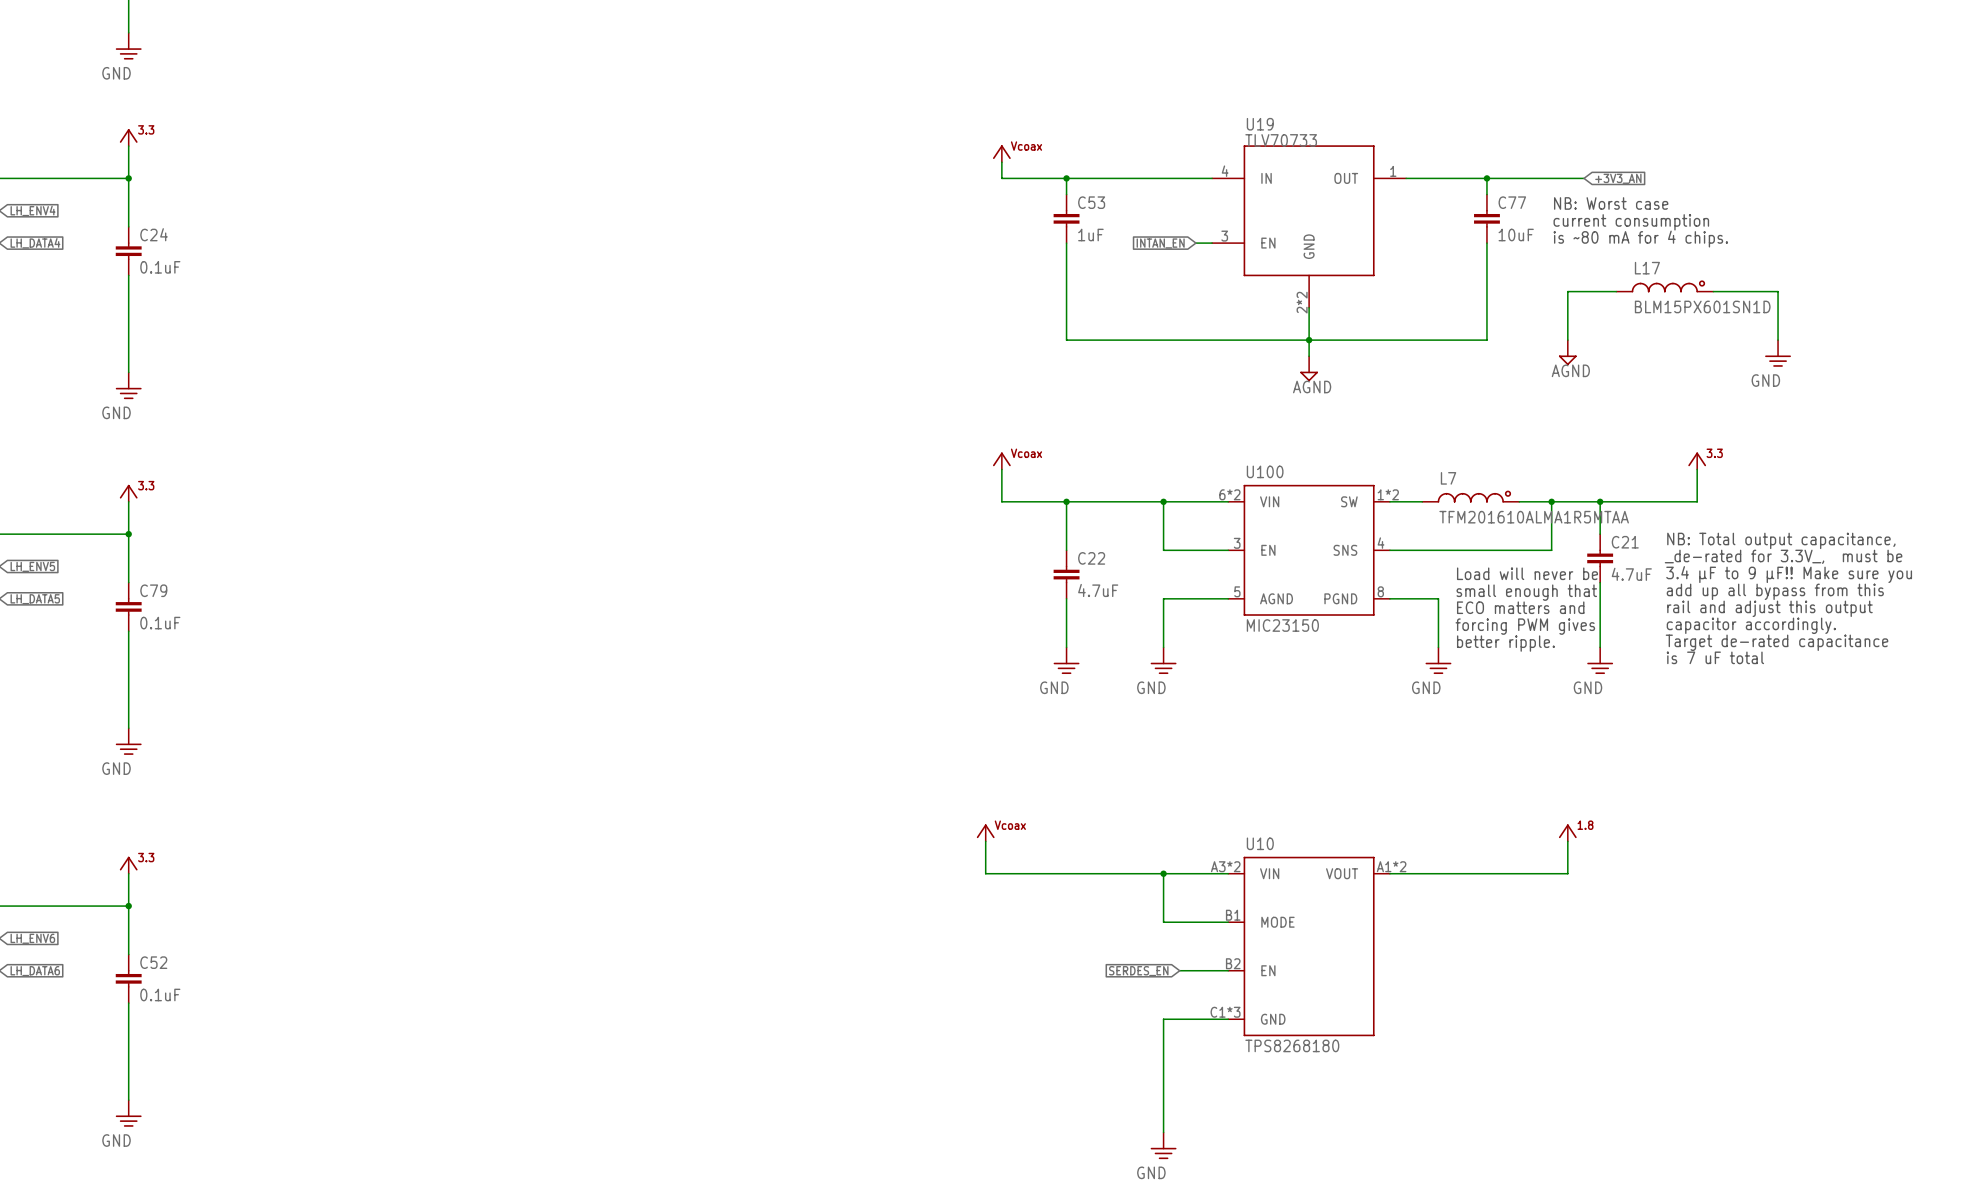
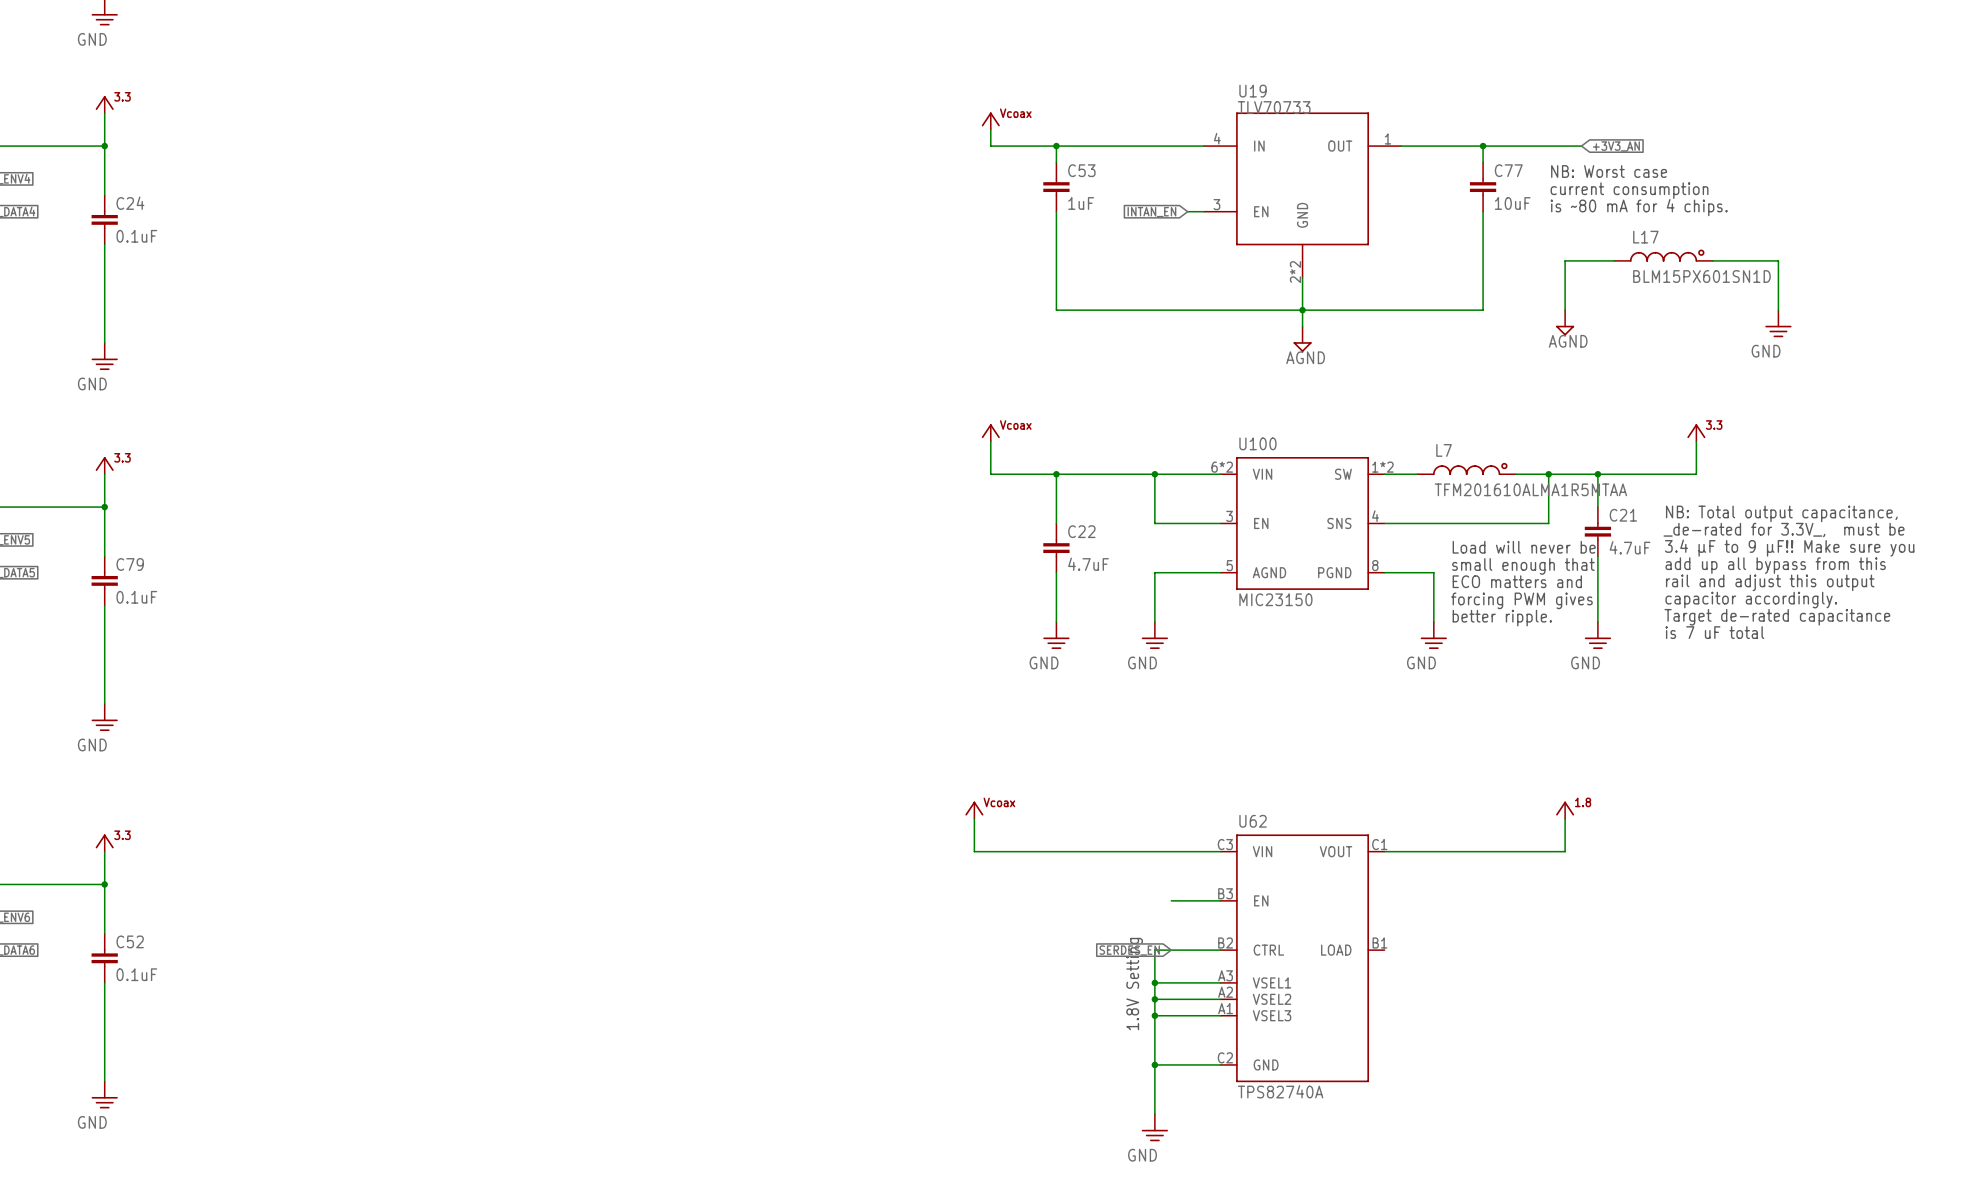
wire: (1163, 873) (1163, 922) (1179, 922) -> none
junction: (1163, 873) -> none
U10: TPS8268180 (1309, 946) -> none
wire: none -> (1171, 950) (1154, 950) (1154, 999)
U62: none -> TPS82740A (1302, 958)
wire: none -> (1154, 982) (1220, 982)
junction: none -> (1154, 982)
text: none -> 1.8V Setting (1134, 984)
junction: none -> (1154, 999)
wire: none -> (1154, 1015) (1220, 1015)
junction: none -> (1154, 1015)
wire: none -> (1154, 1064) (1220, 1064)
junction: none -> (1154, 1064)

